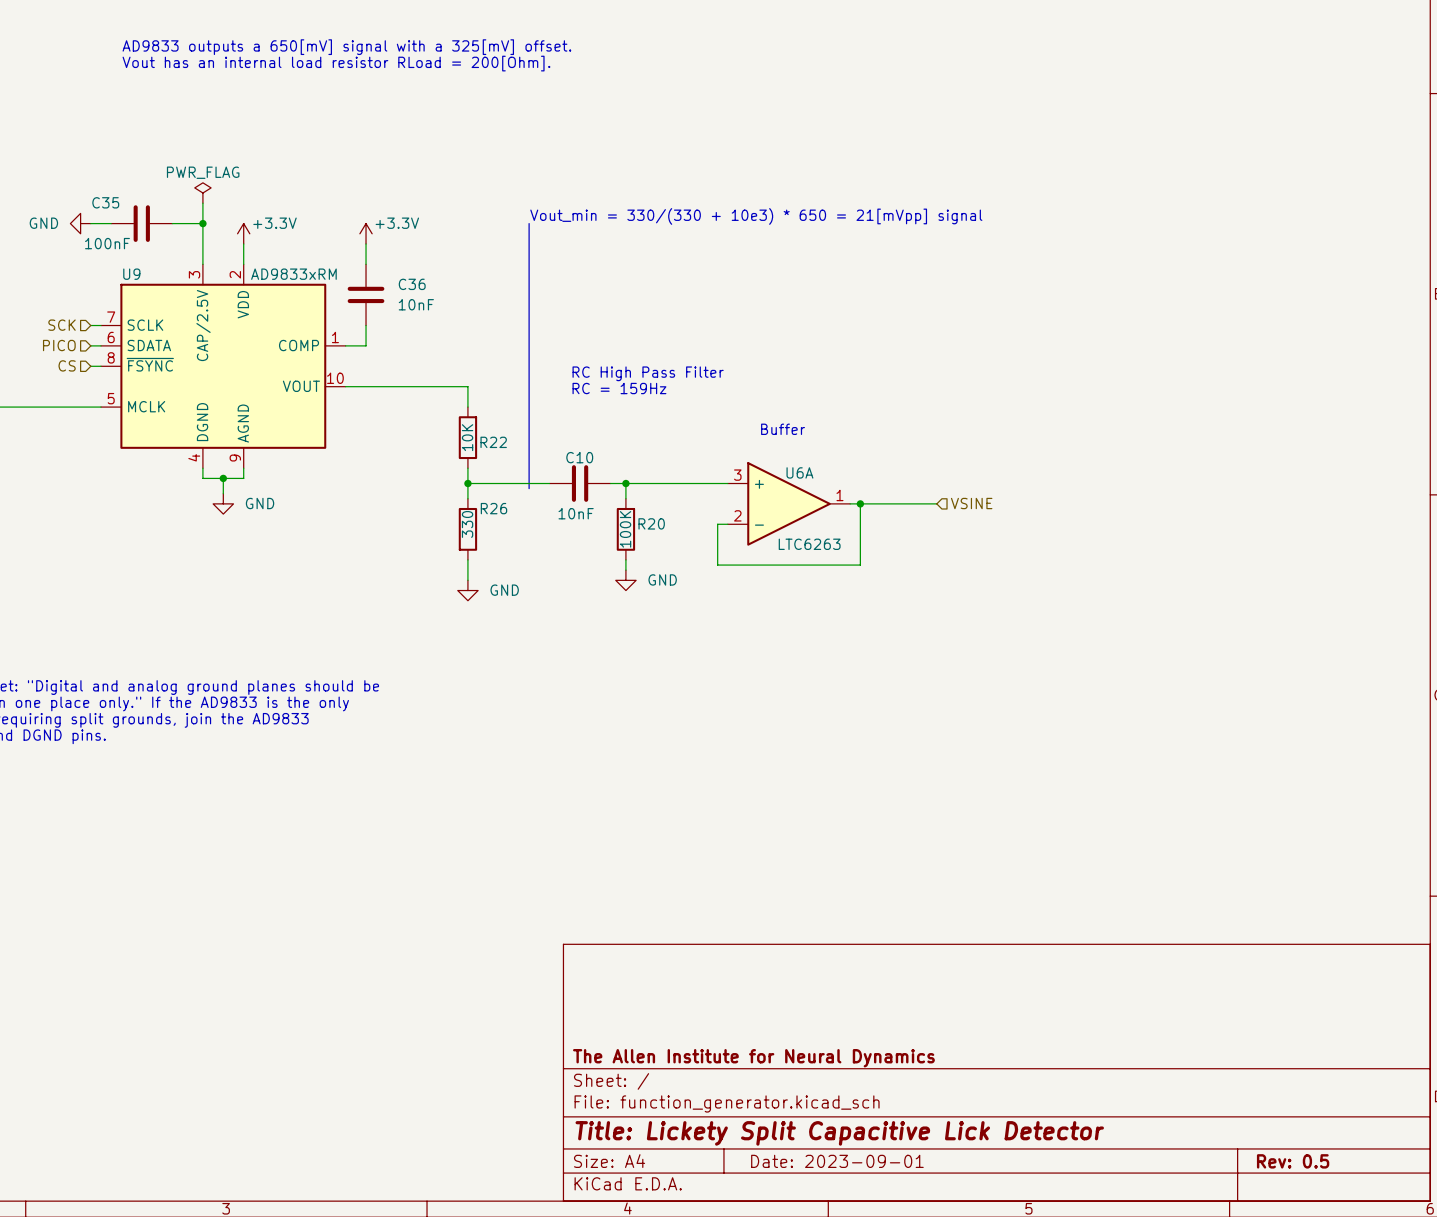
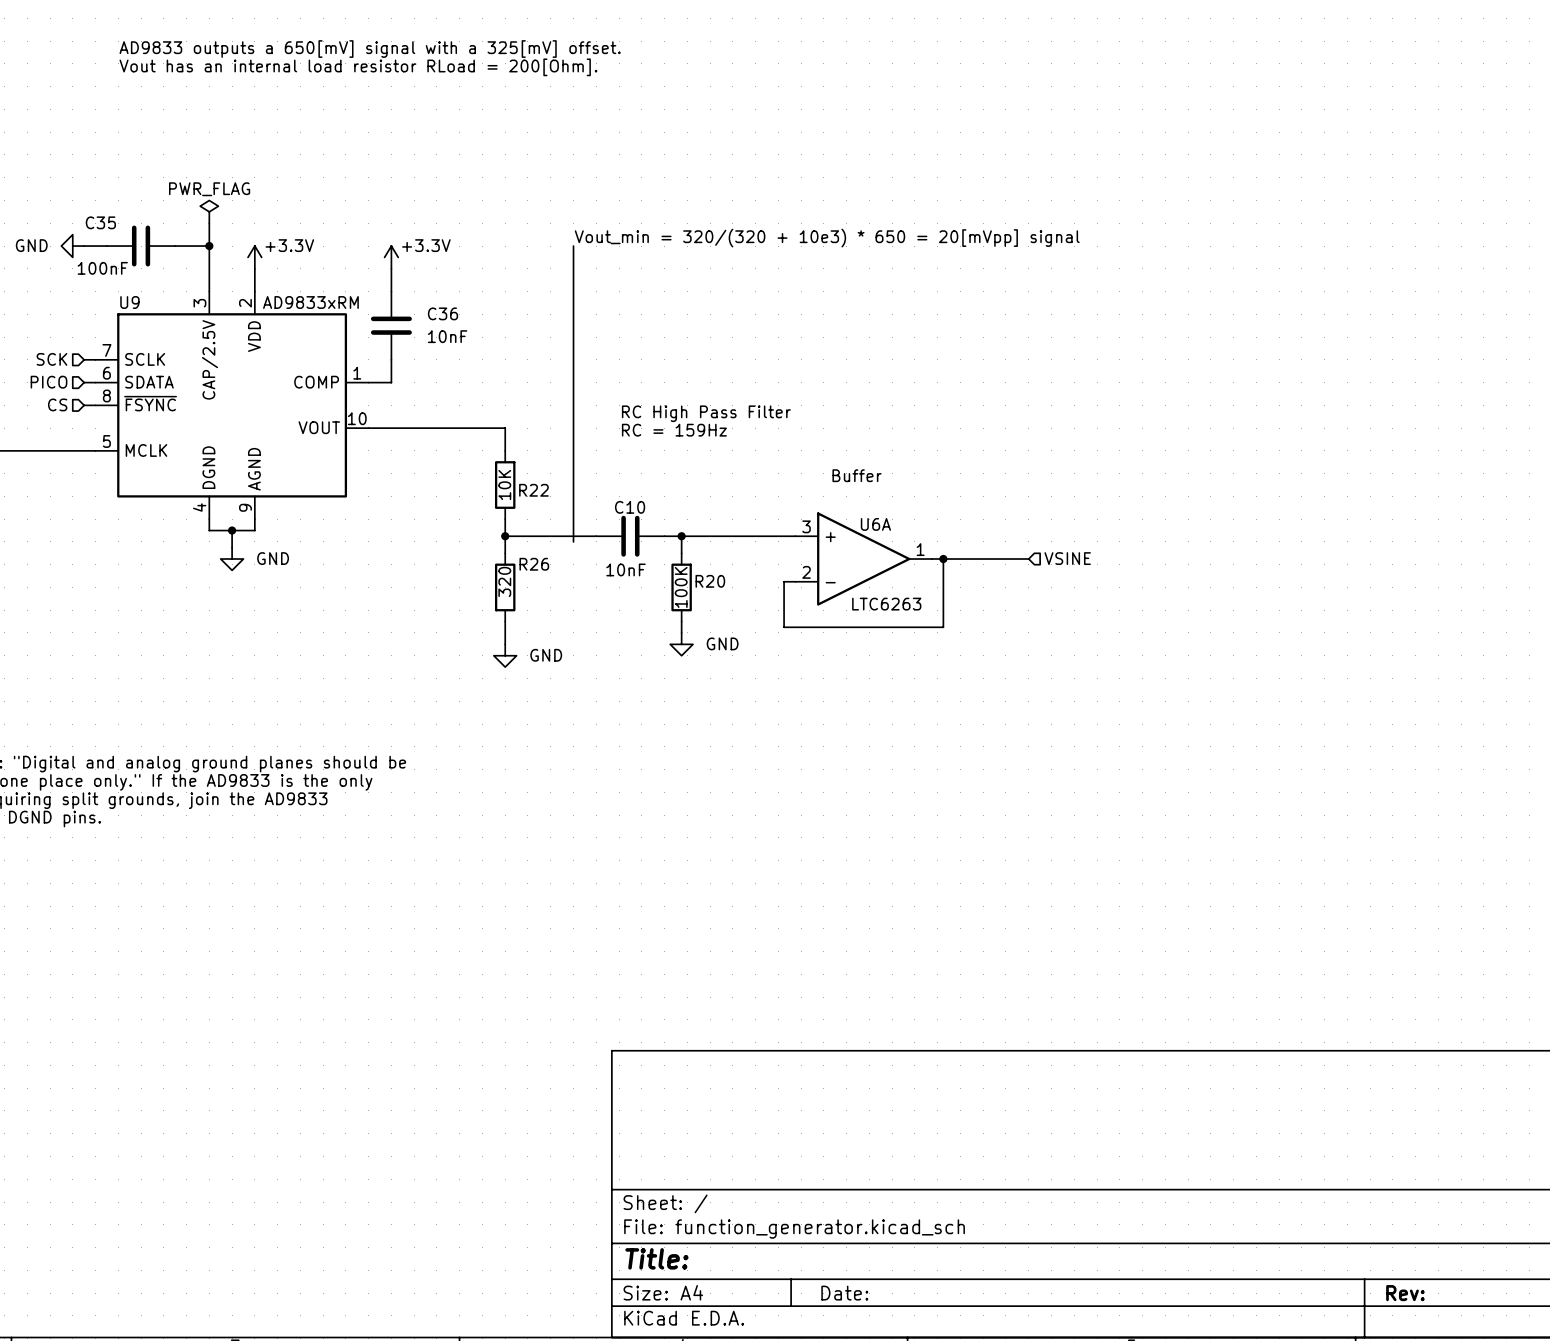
text: Vout_min = 330/(330 + 10e3) * 650 = 21[mVpp] signal (756, 216) -> Vout_min = 320/(320 + 10e3) * 650 = 20[mVpp] signal (827, 238)
R26 value: 330 (467, 524) -> 320 (504, 581)
title block: The Allen Institute for Neural Dynamics (753, 1058) -> none
title block: Title: Lickety Split Capacitive Lick Detector (839, 1133) -> Title: (656, 1258)
title block: Date: 2023-09-01 (837, 1161) -> Date: (844, 1293)
title block: Rev: 0.5 (1293, 1161) -> Rev: (1405, 1293)

